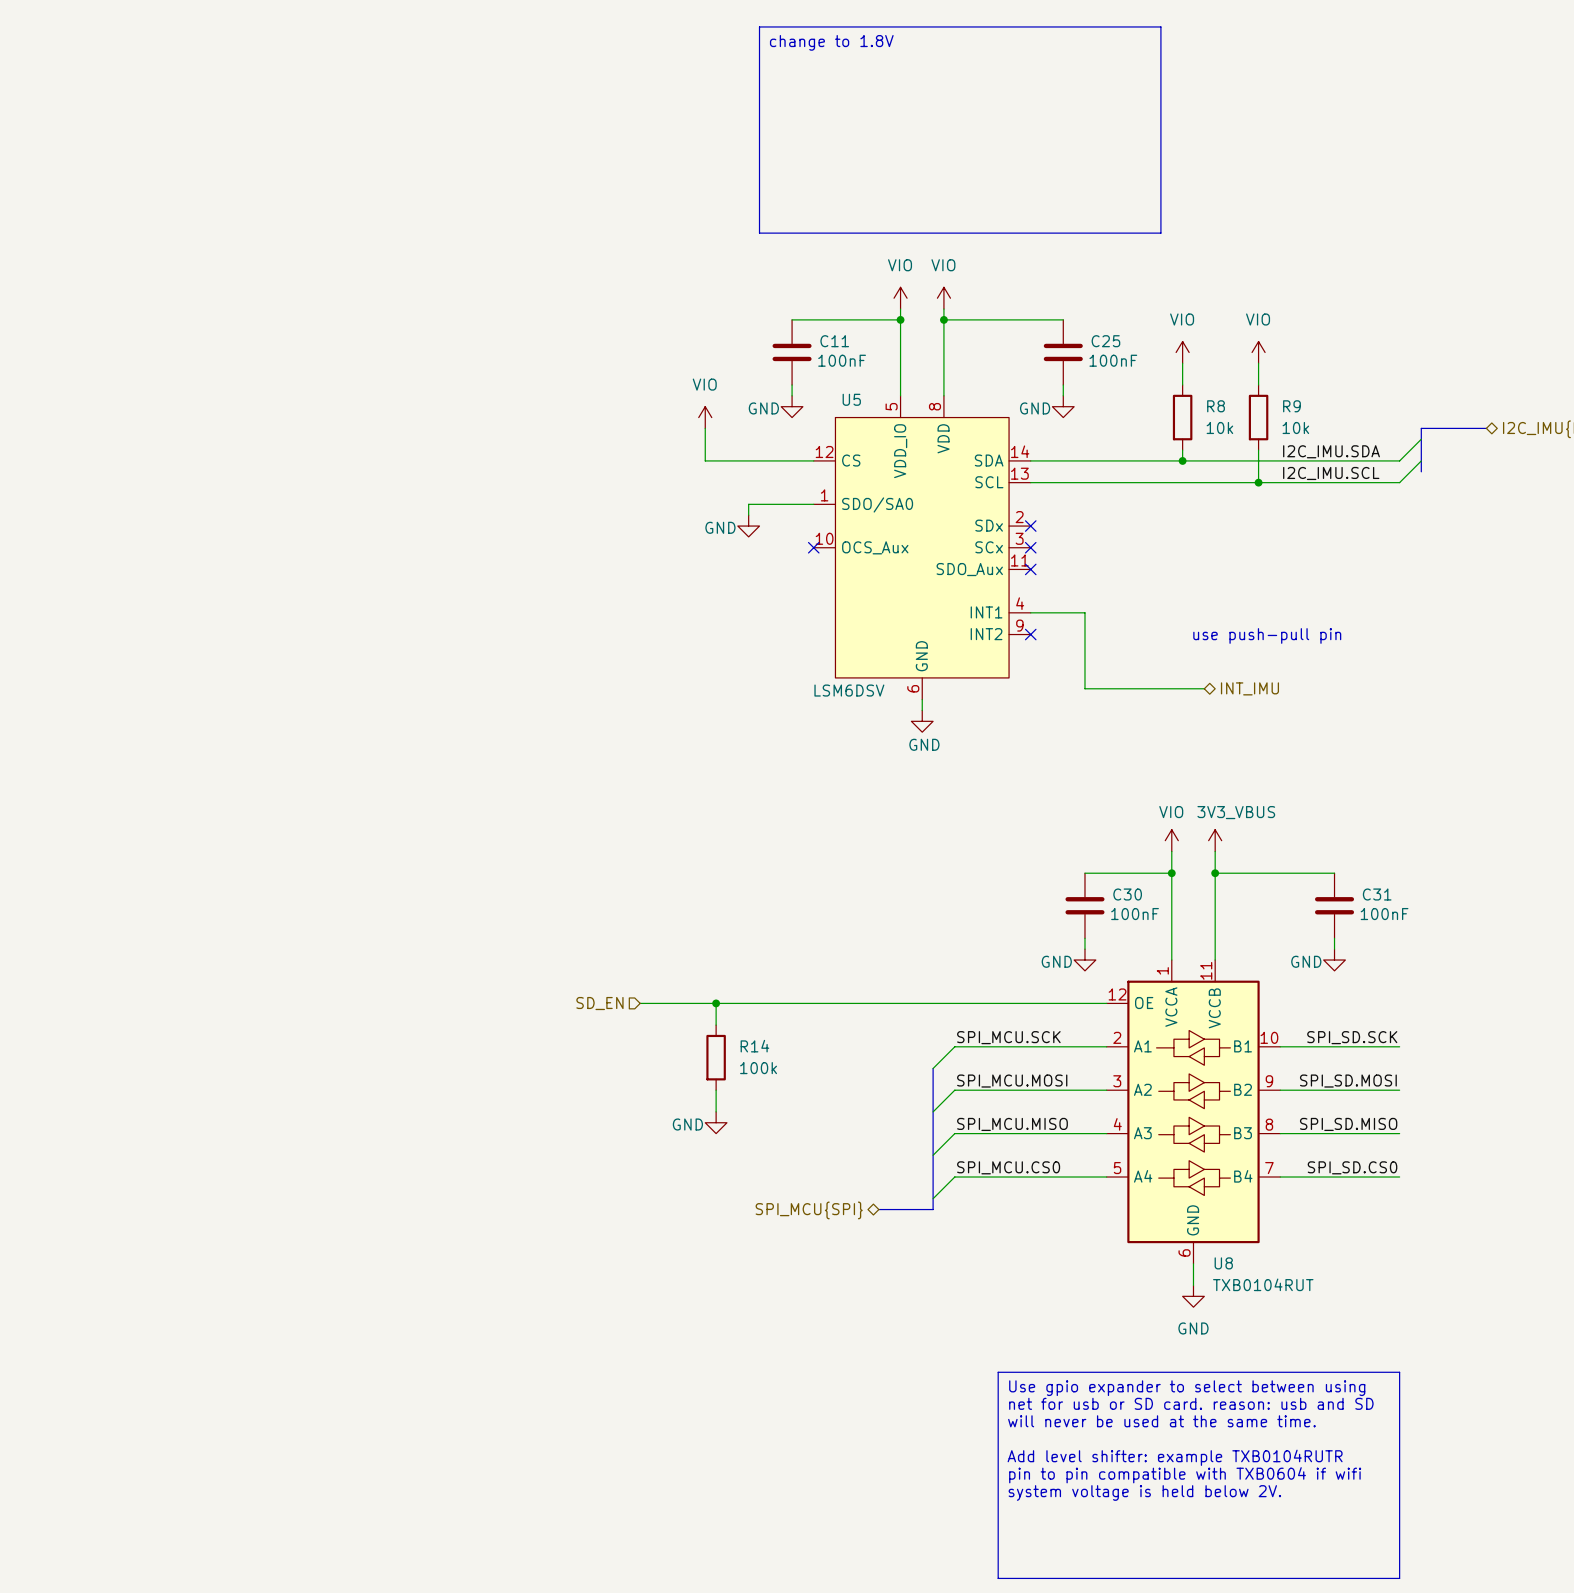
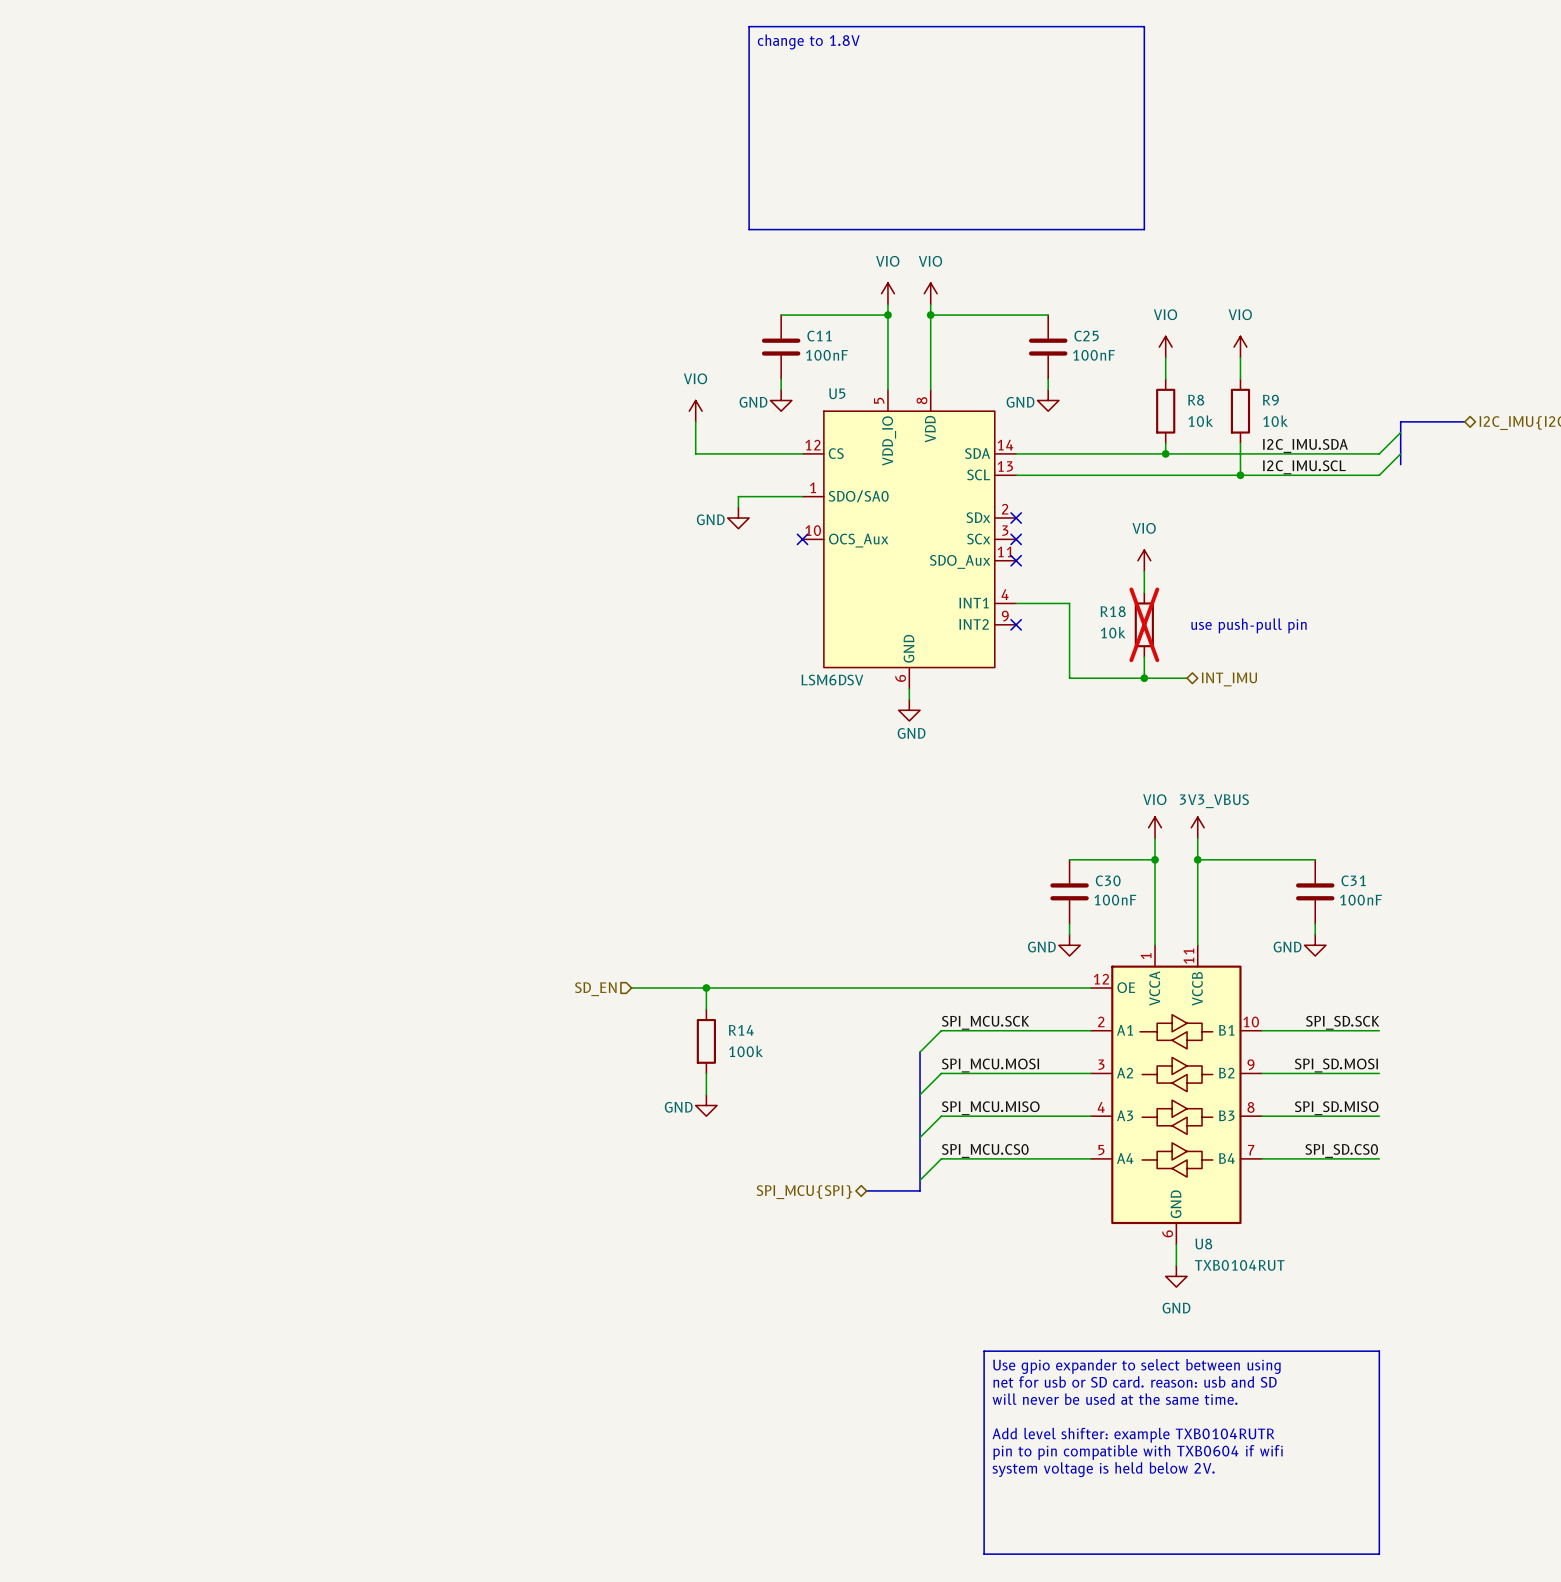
power symbol: none -> VIO (1144, 560)
wire: none -> (1144, 571) (1144, 592)
R18: none -> 10k (1144, 624)
wire: none -> (1144, 656) (1144, 678)
junction: none -> (1144, 678)

